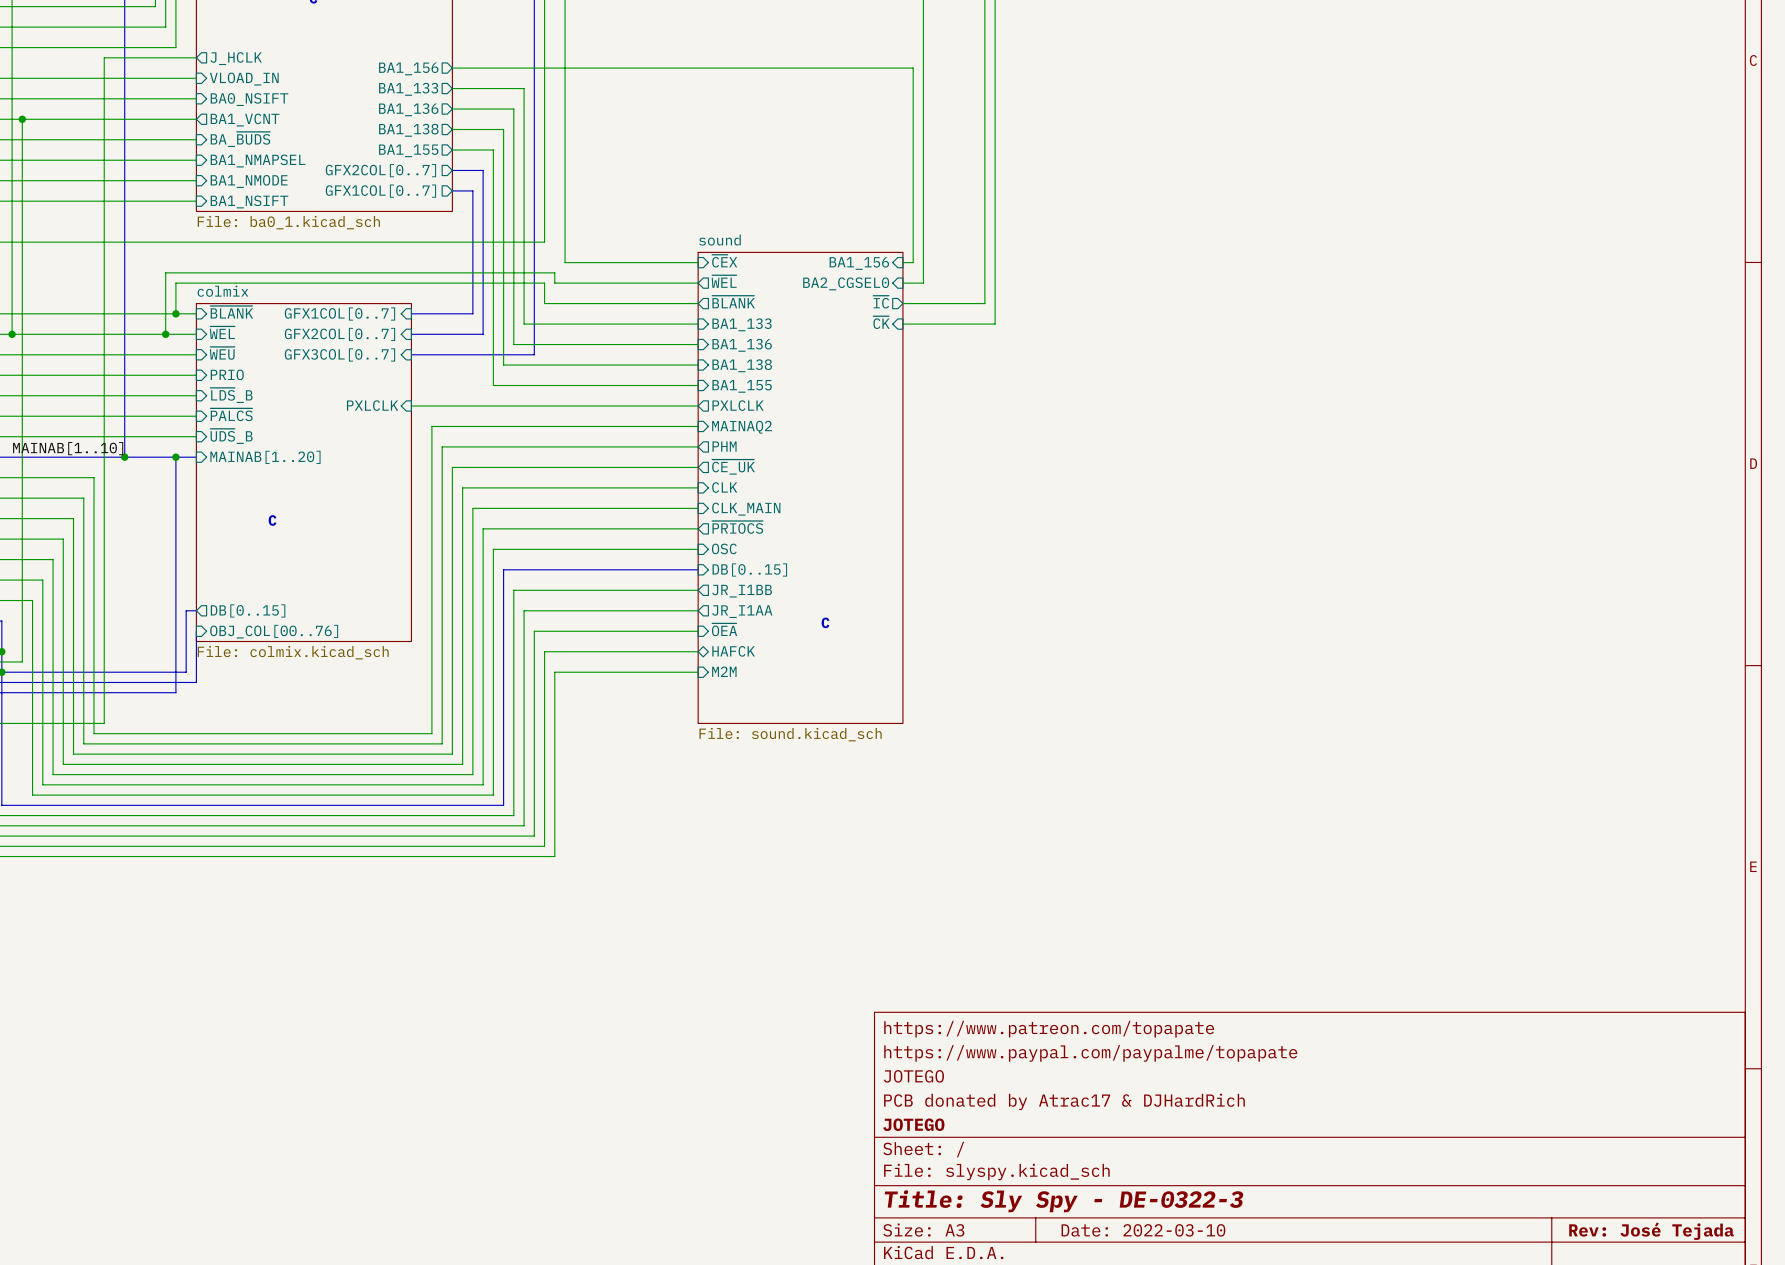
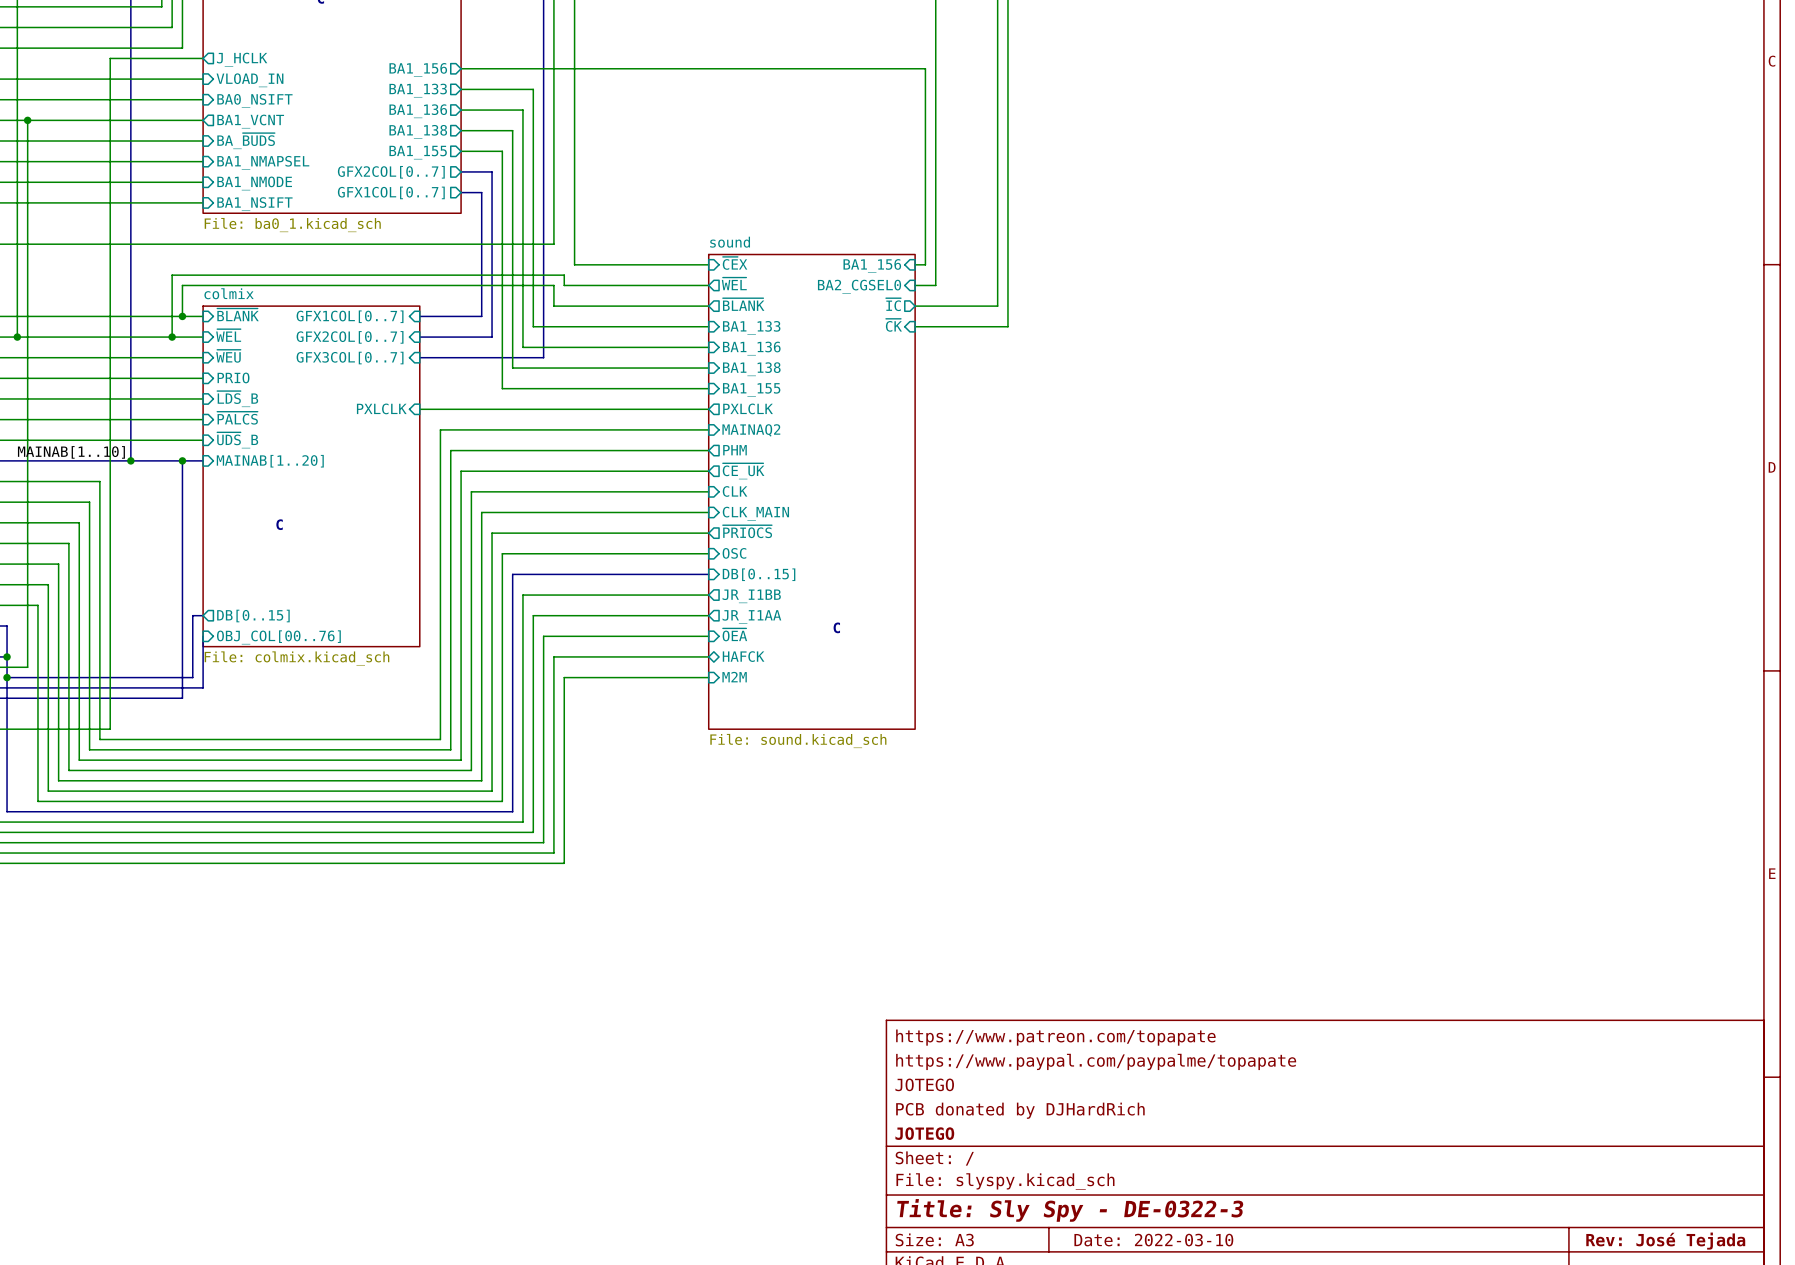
title block: PCB donated by Atrac17 & DJHardRich (1064, 1101) -> PCB donated by DJHardRich (1020, 1110)

